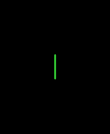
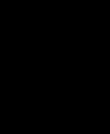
wire: (55, 55) (55, 78) -> none

